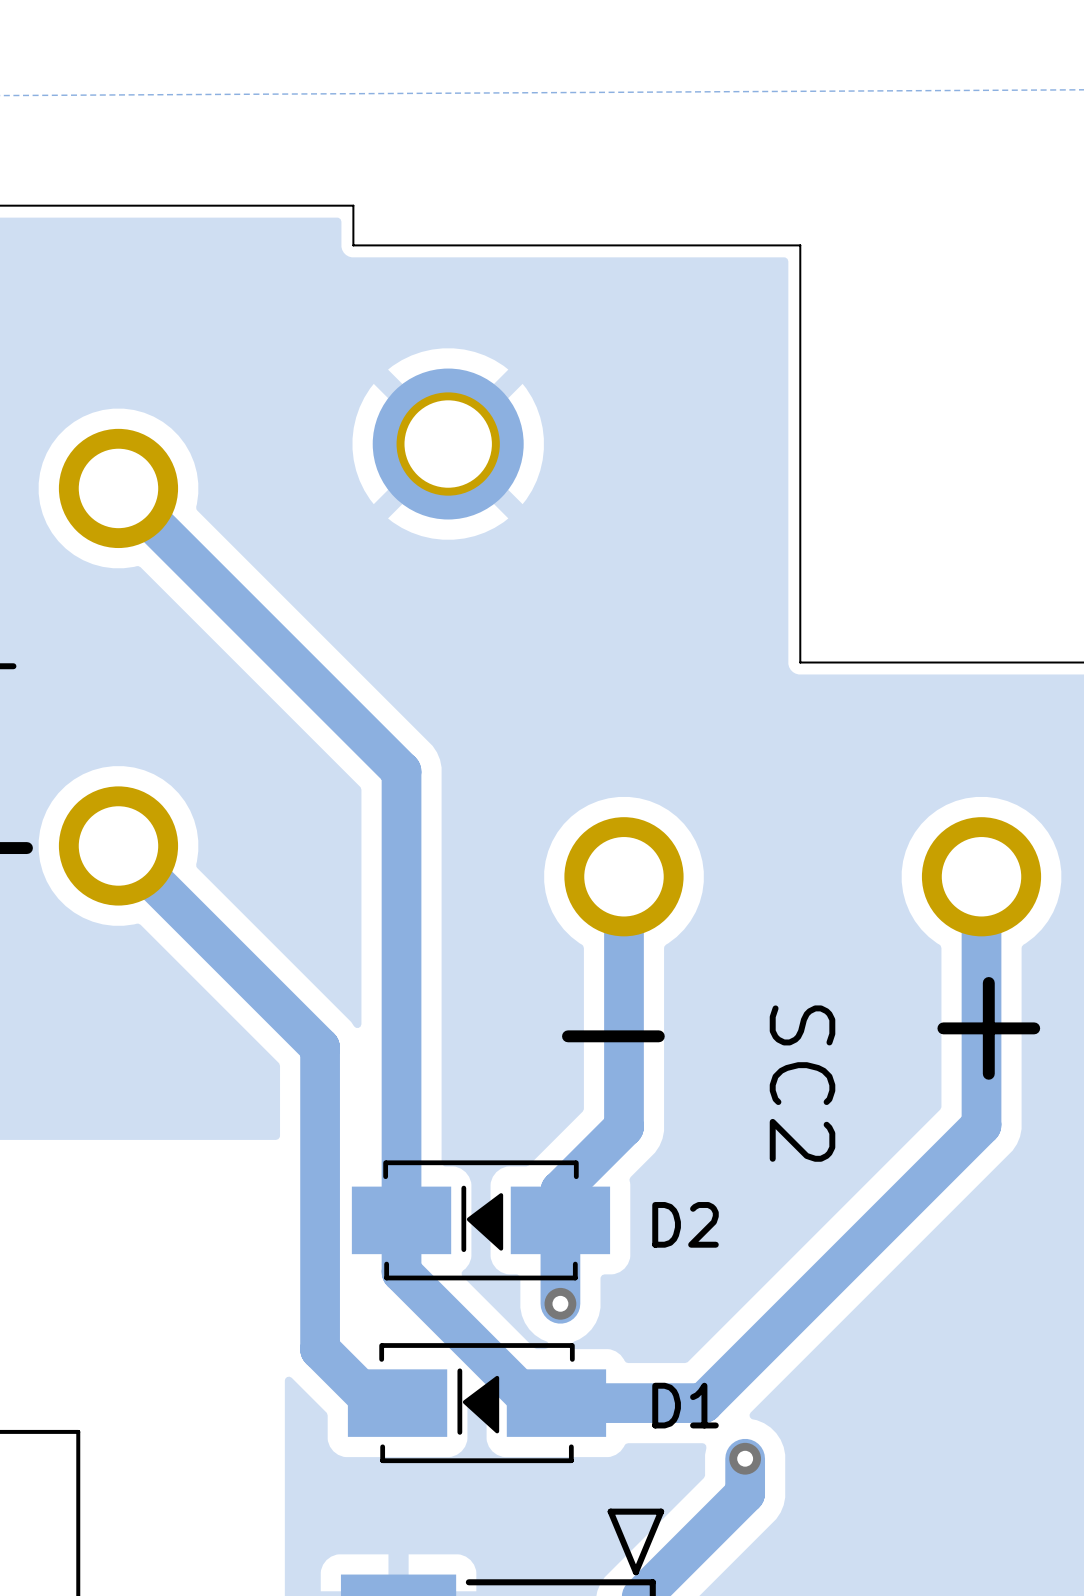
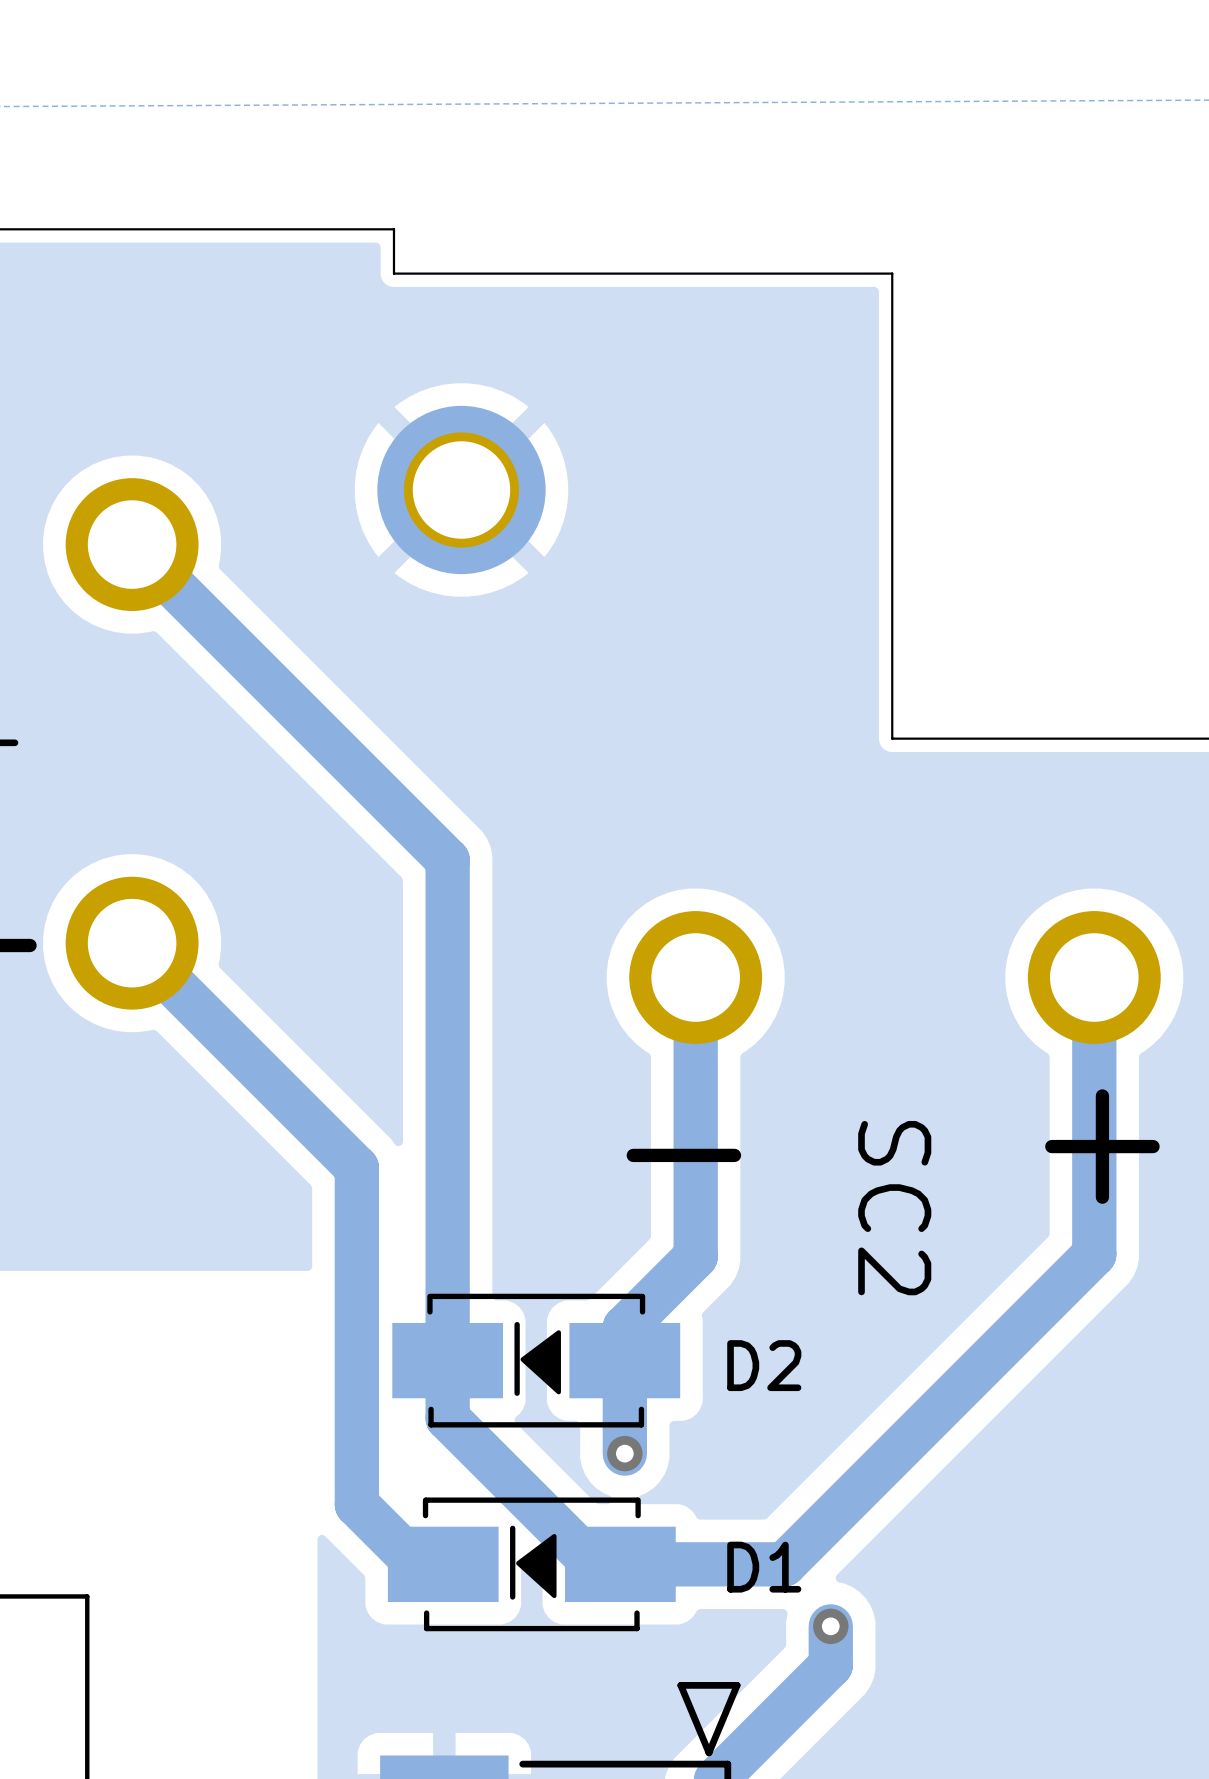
part position: (448, 444) -> (461, 489)

